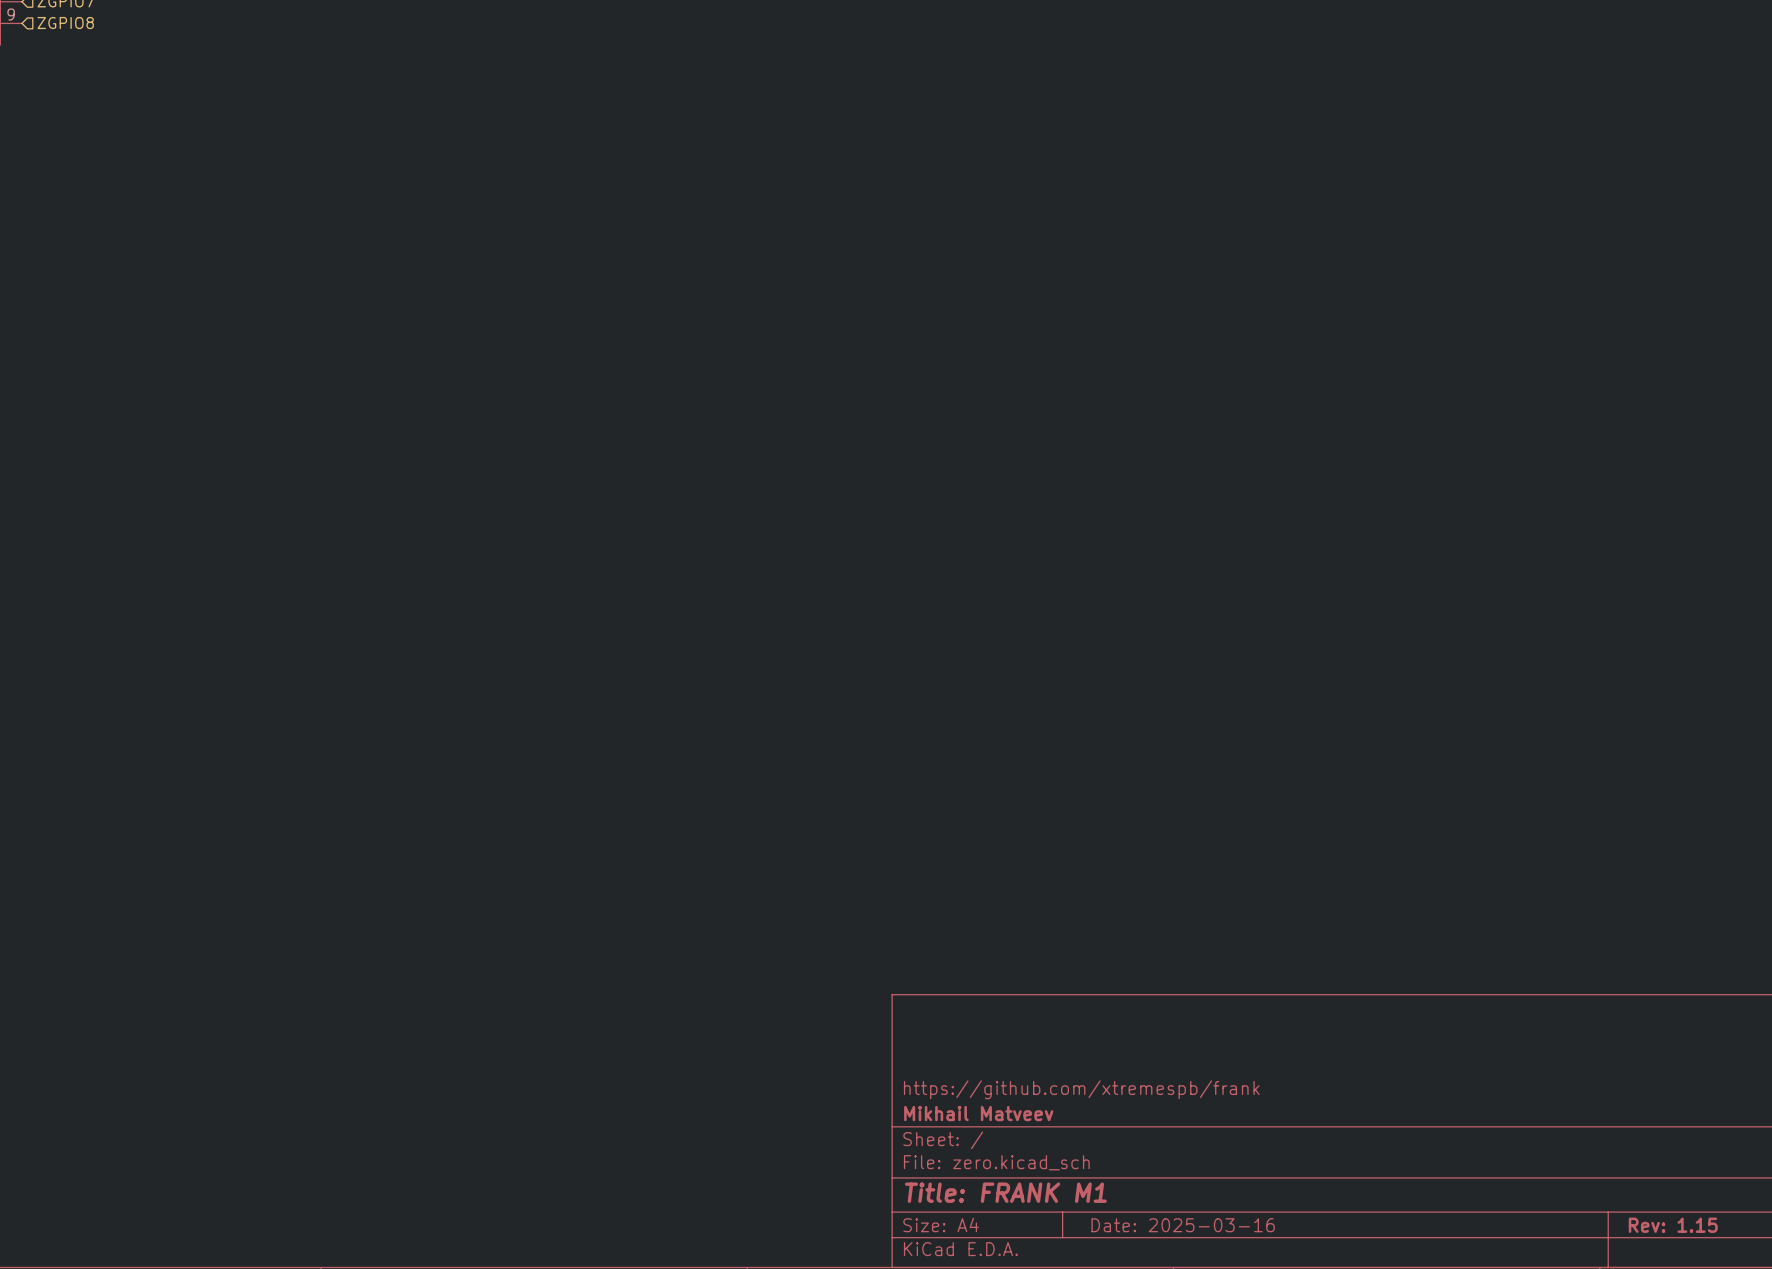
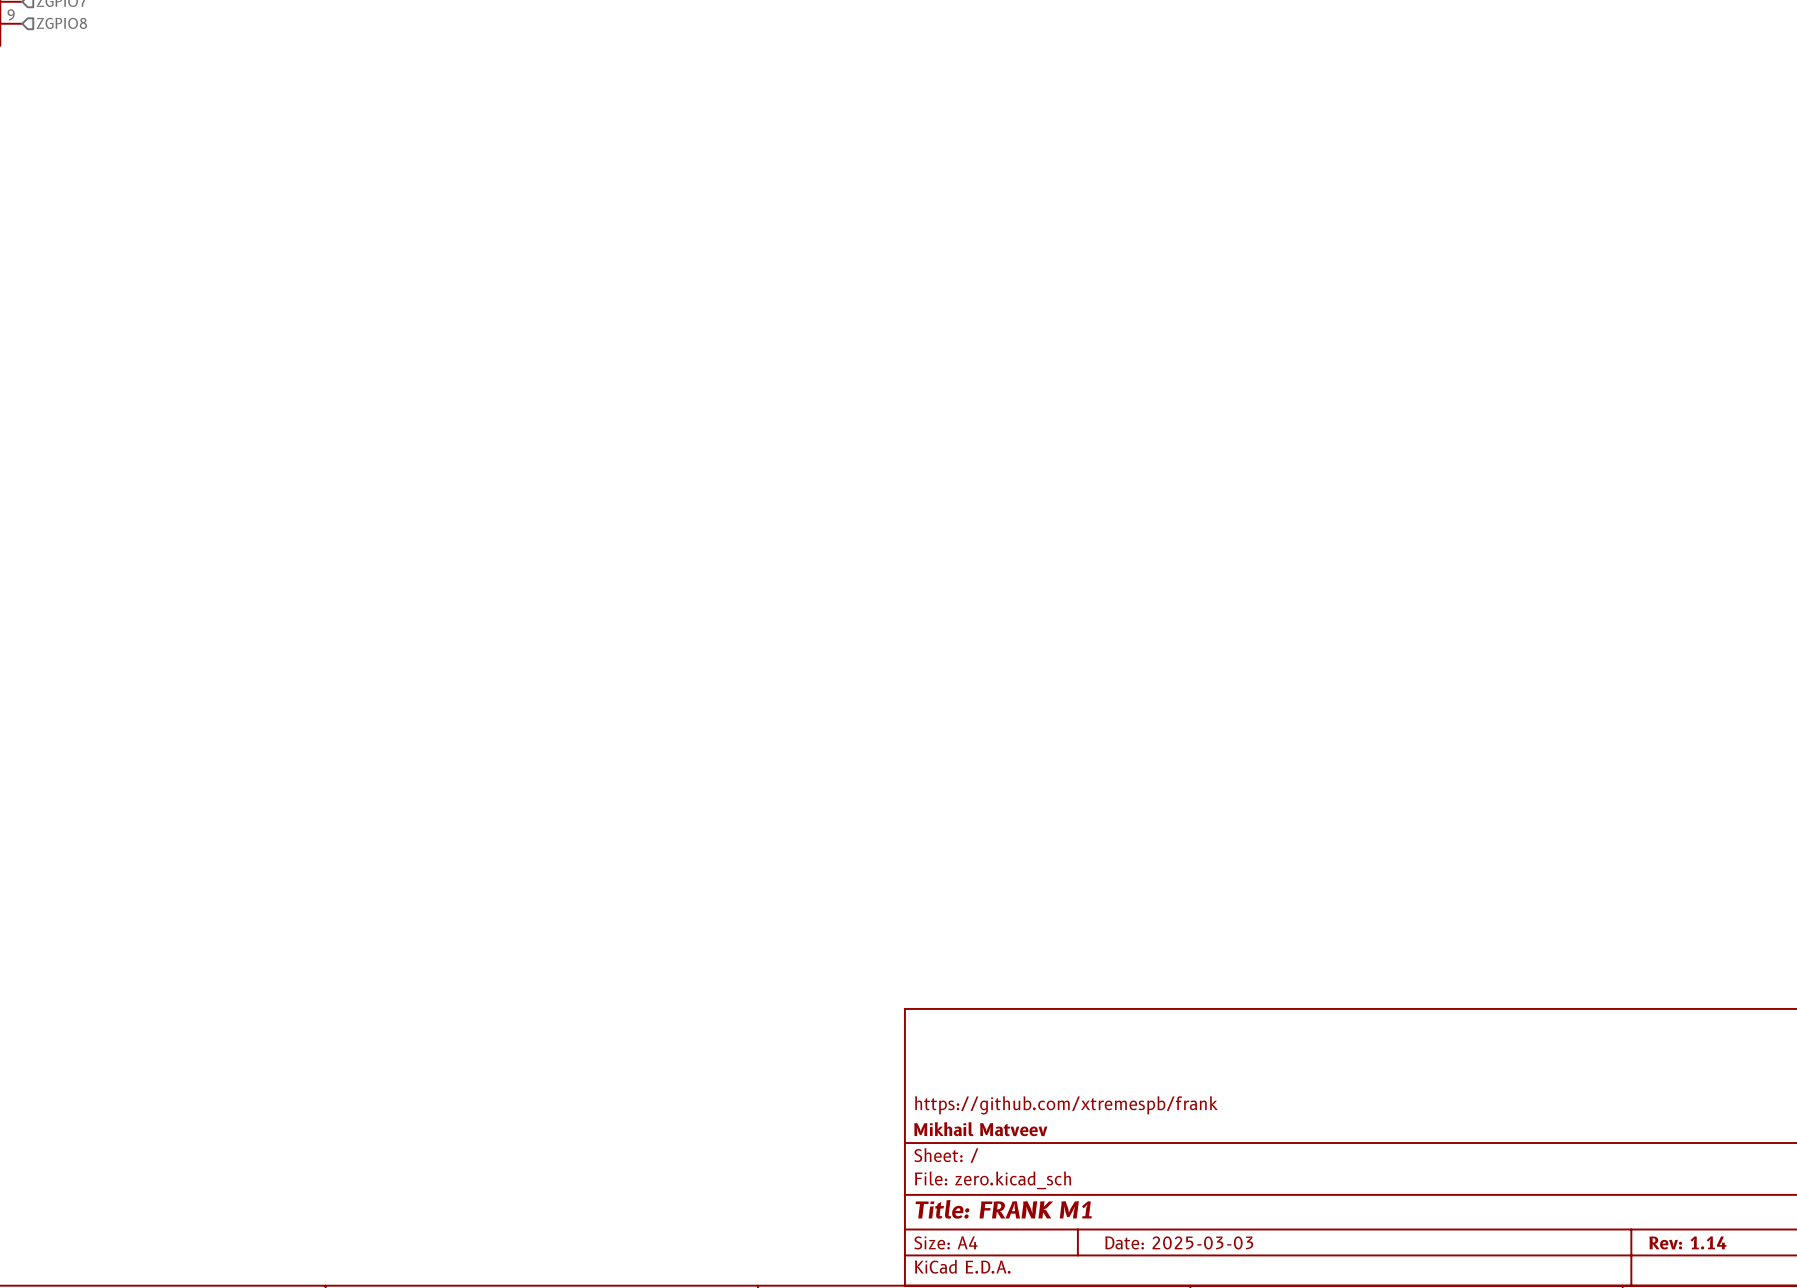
title block: Date: 2025-03-16 (1183, 1225) -> Date: 2025-03-03 (1179, 1242)
title block: Rev: 1.15 (1673, 1225) -> Rev: 1.14 (1687, 1242)

